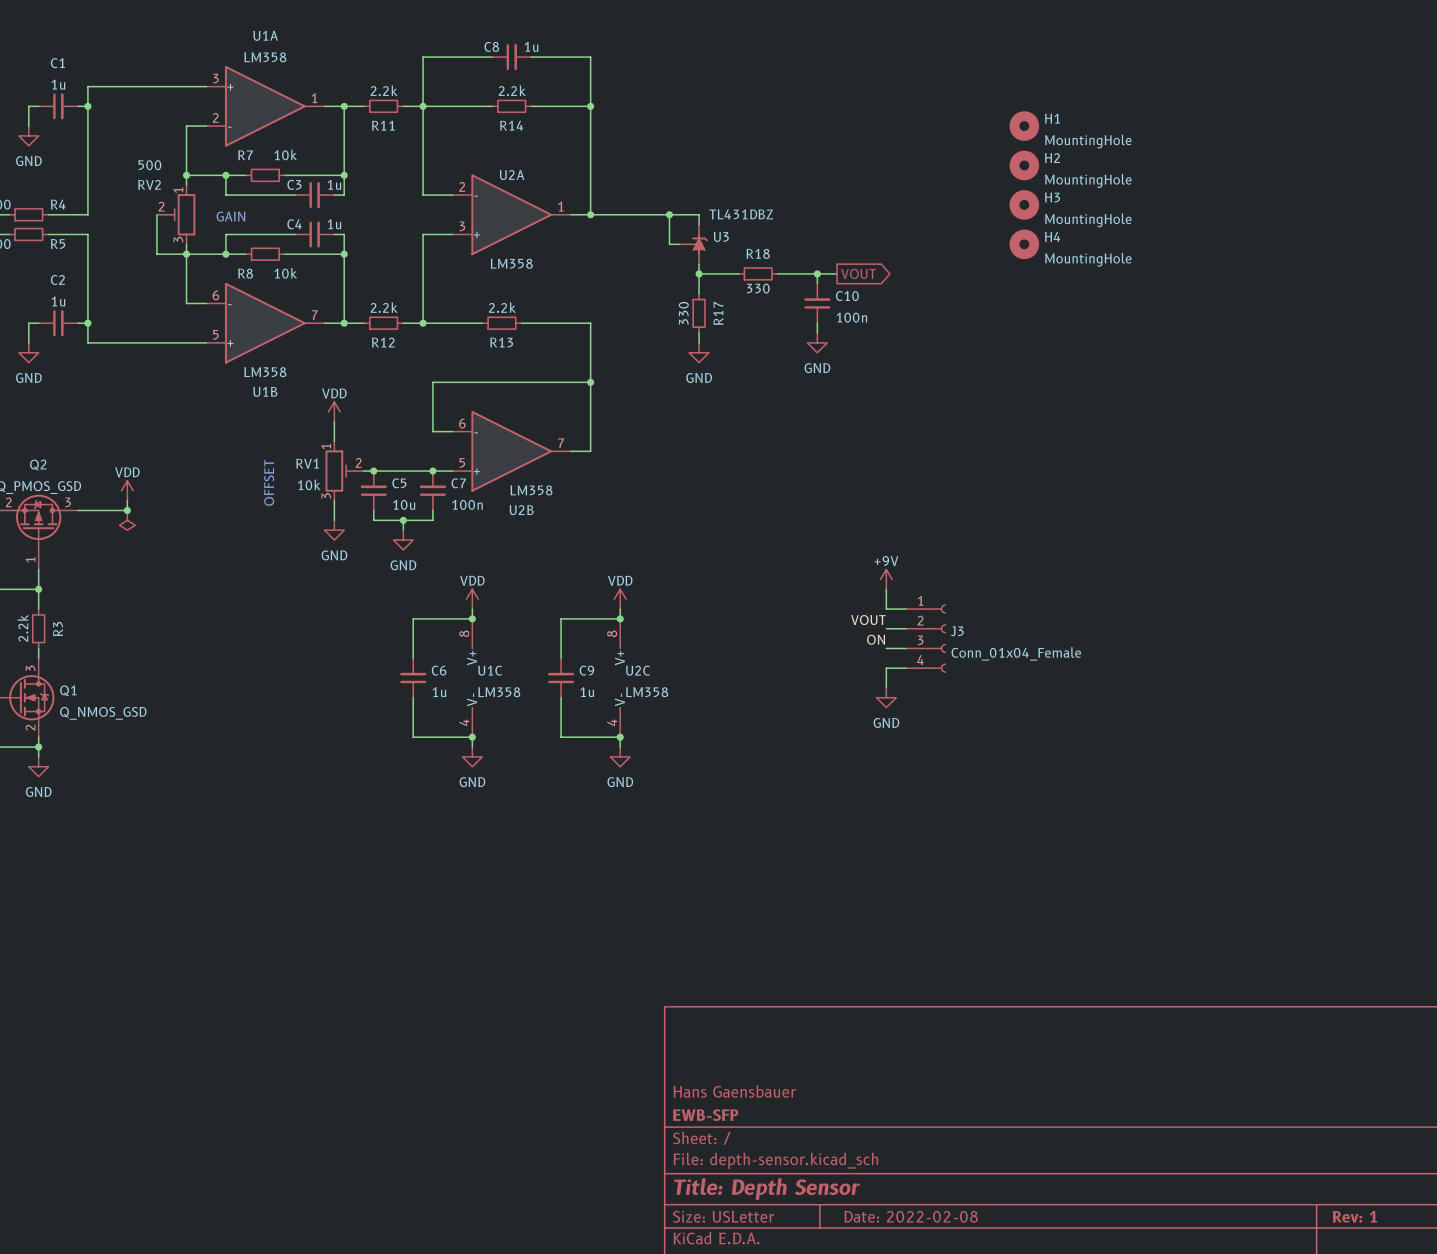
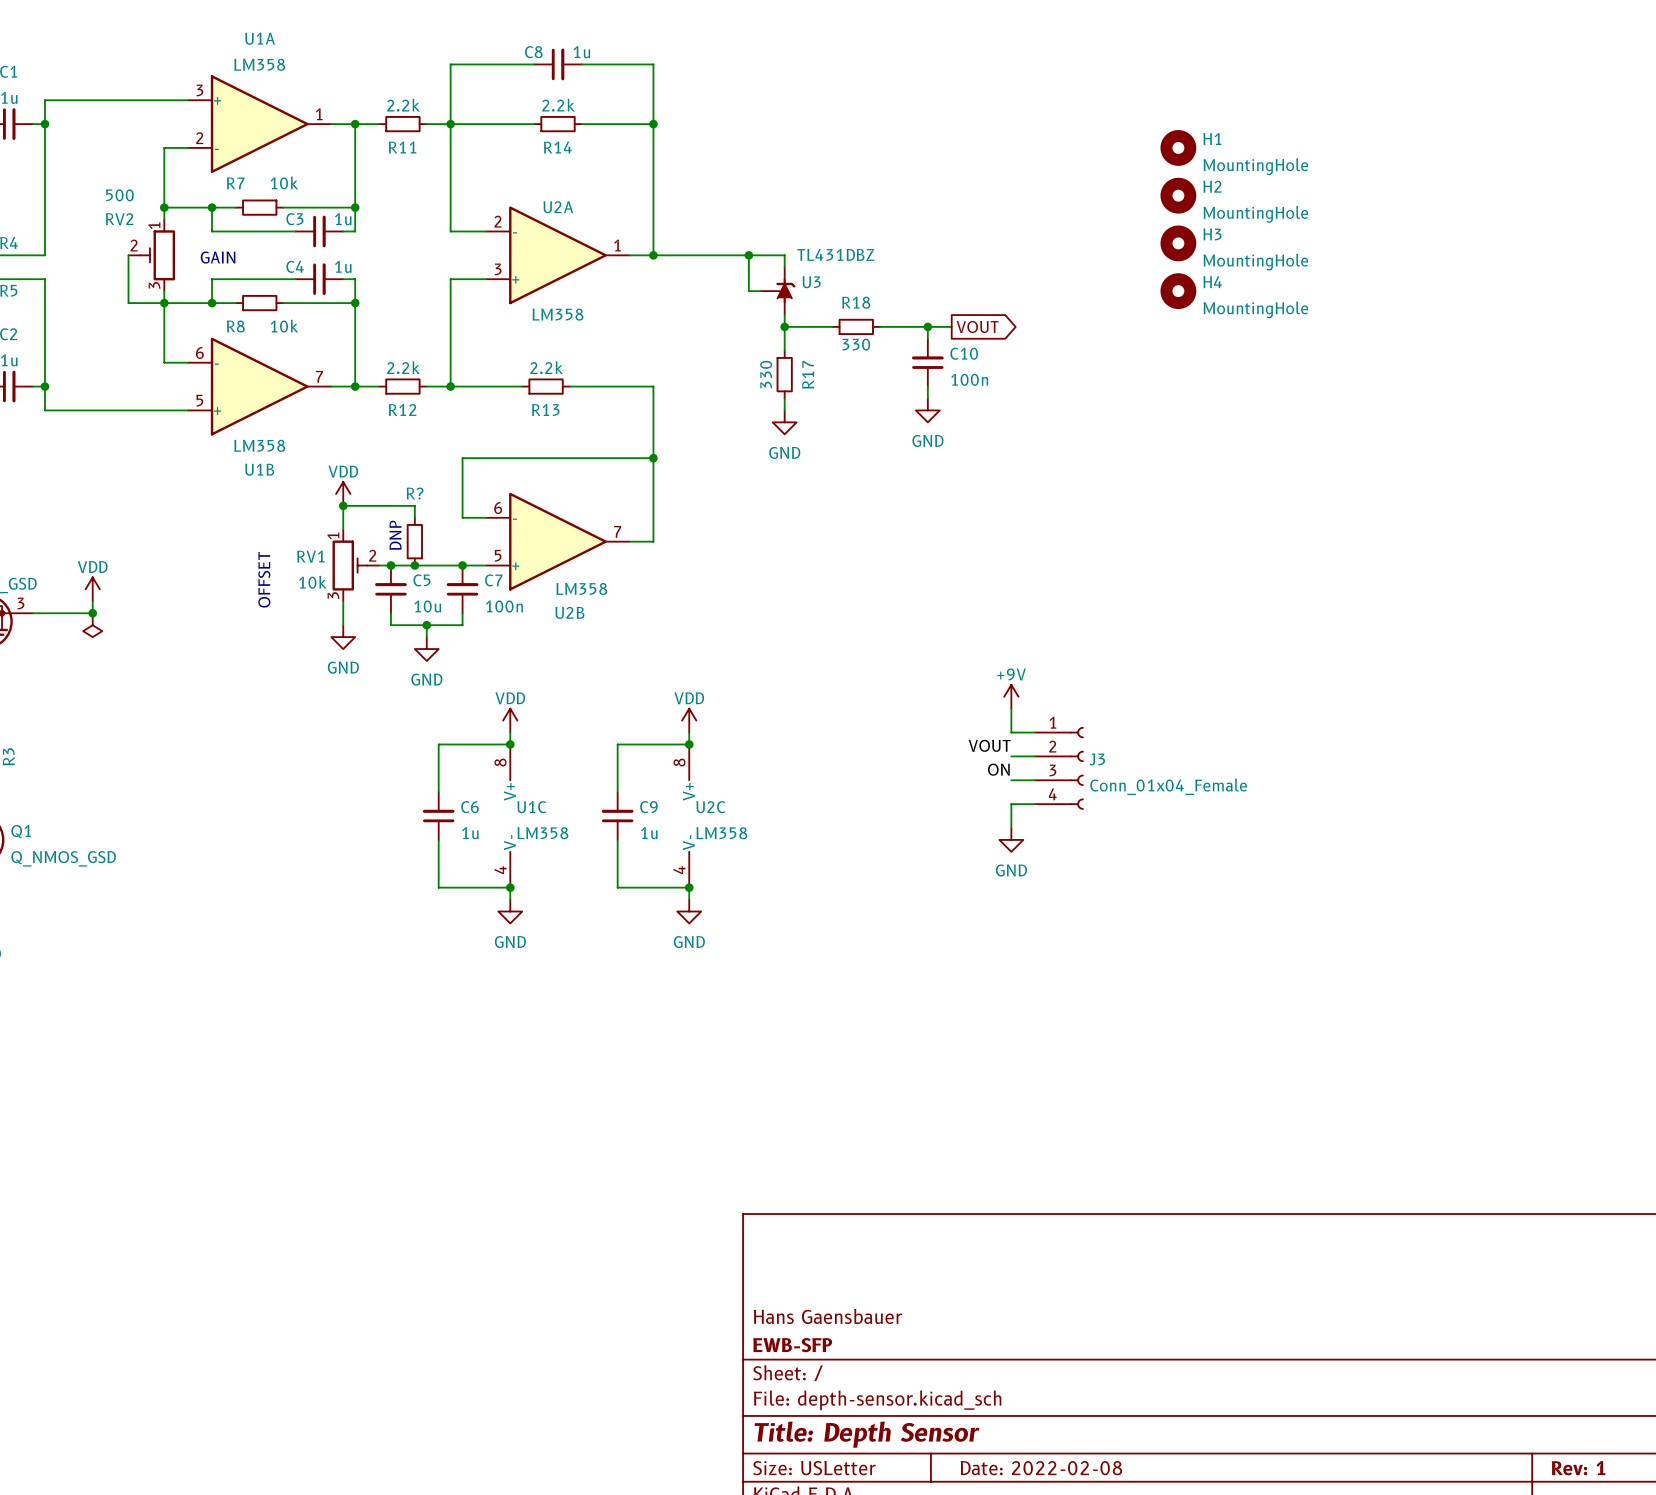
wire: none -> (343, 505) (414, 505) (414, 517)
junction: none -> (343, 505)
text: none -> DNP (395, 535)
R?: none -> (414, 541)
junction: none -> (414, 565)

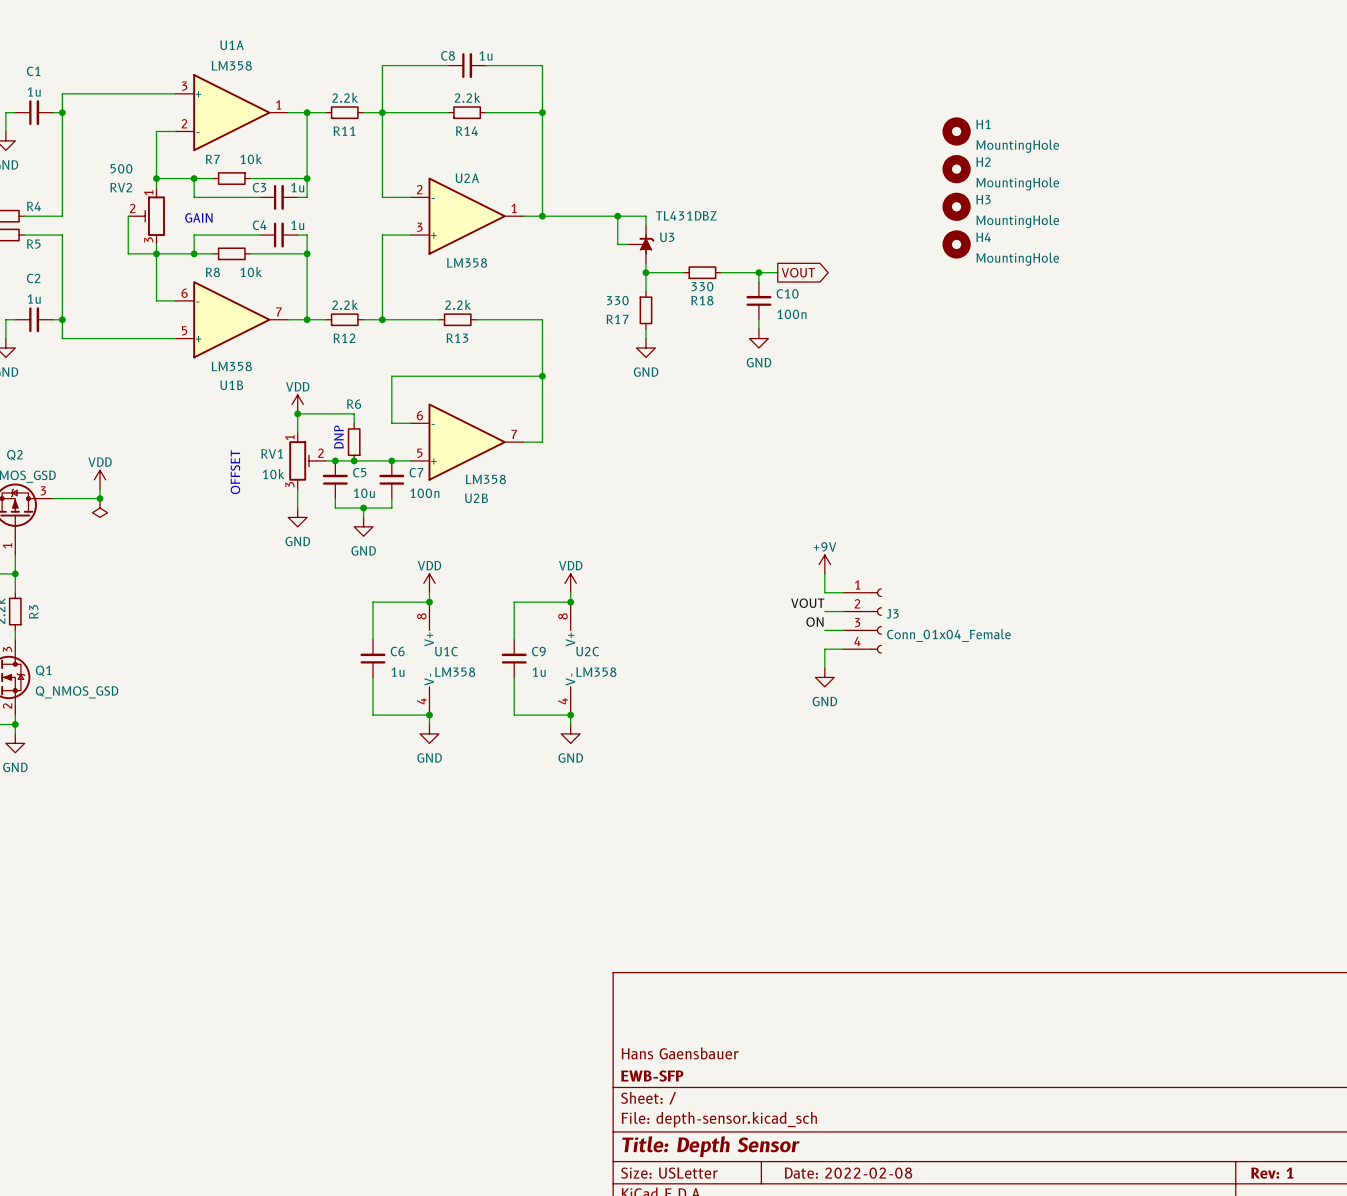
R18 name position: R18 (856, 302) -> R18 (702, 300)
R17 value rotation: 0° (766, 374) -> 90° clockwise (617, 300)
R17 name rotation: 0° (808, 374) -> 90° clockwise (617, 319)
R17 name position: R17 (808, 374) -> R17 (617, 319)
R? name: R? (415, 493) -> R6 (354, 404)

